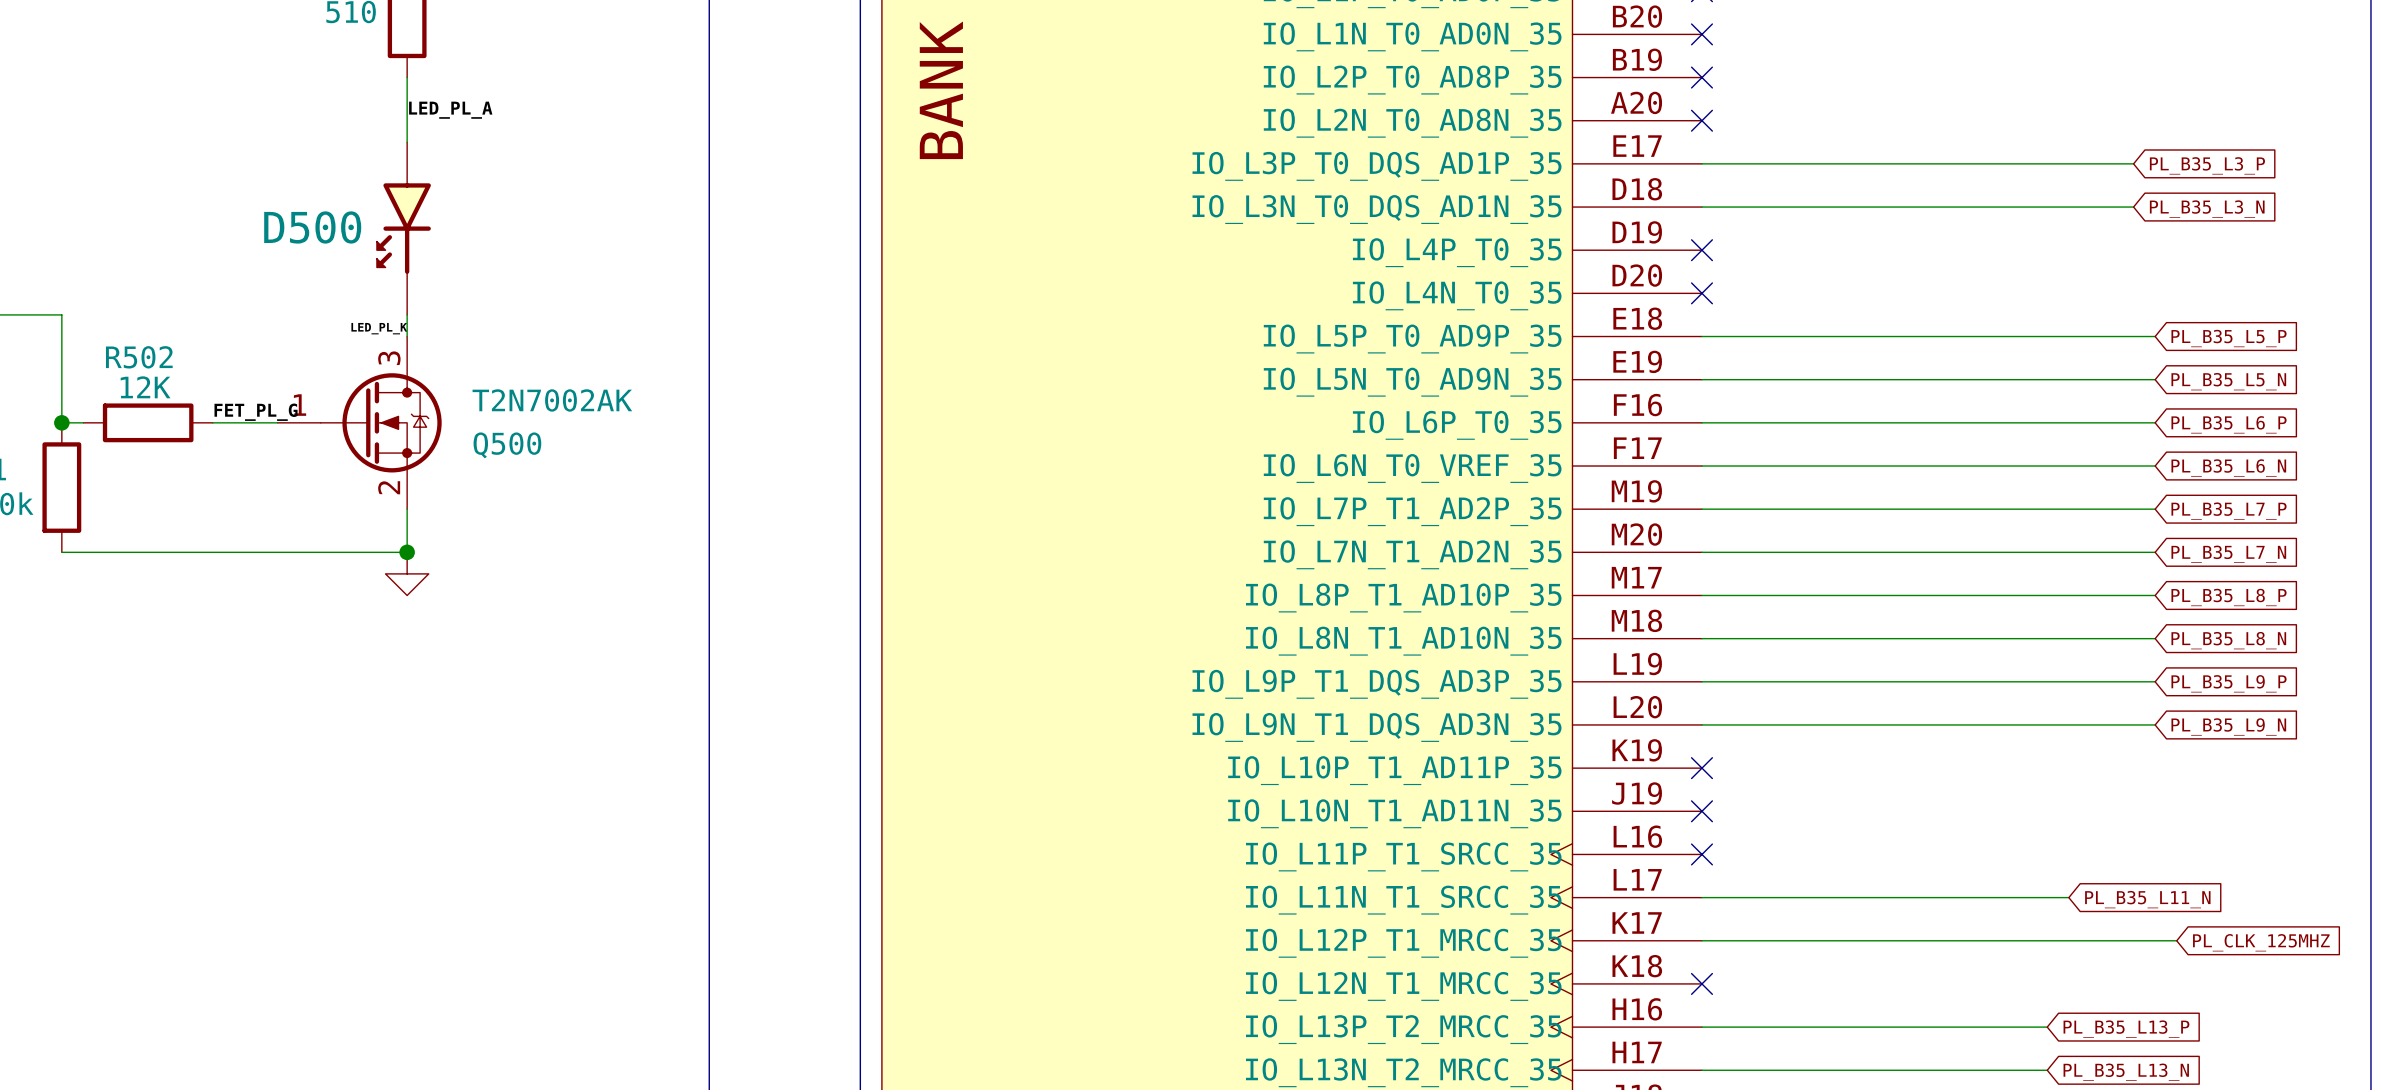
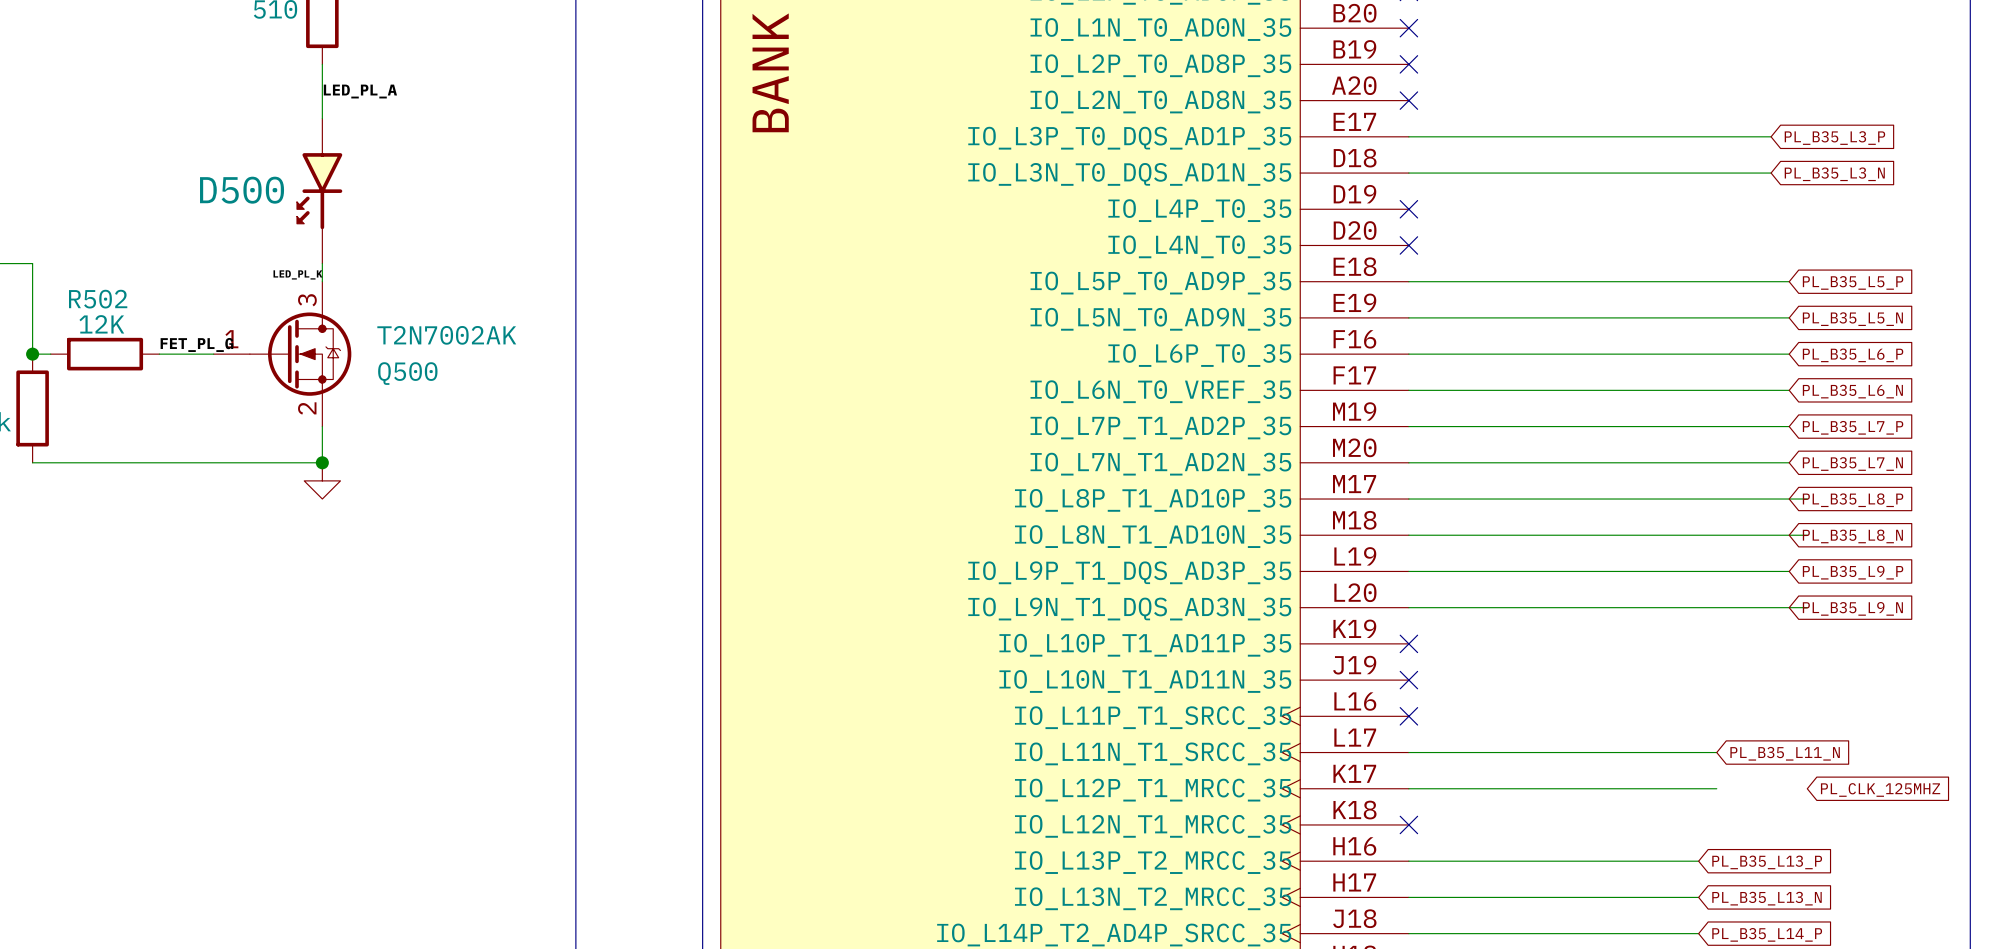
wire: none -> (1789, 499) (1807, 499)
wire: none -> (1789, 535) (1807, 535)
wire: none -> (1789, 607) (1807, 607)
wire: (2068, 940) (2176, 940) -> none

